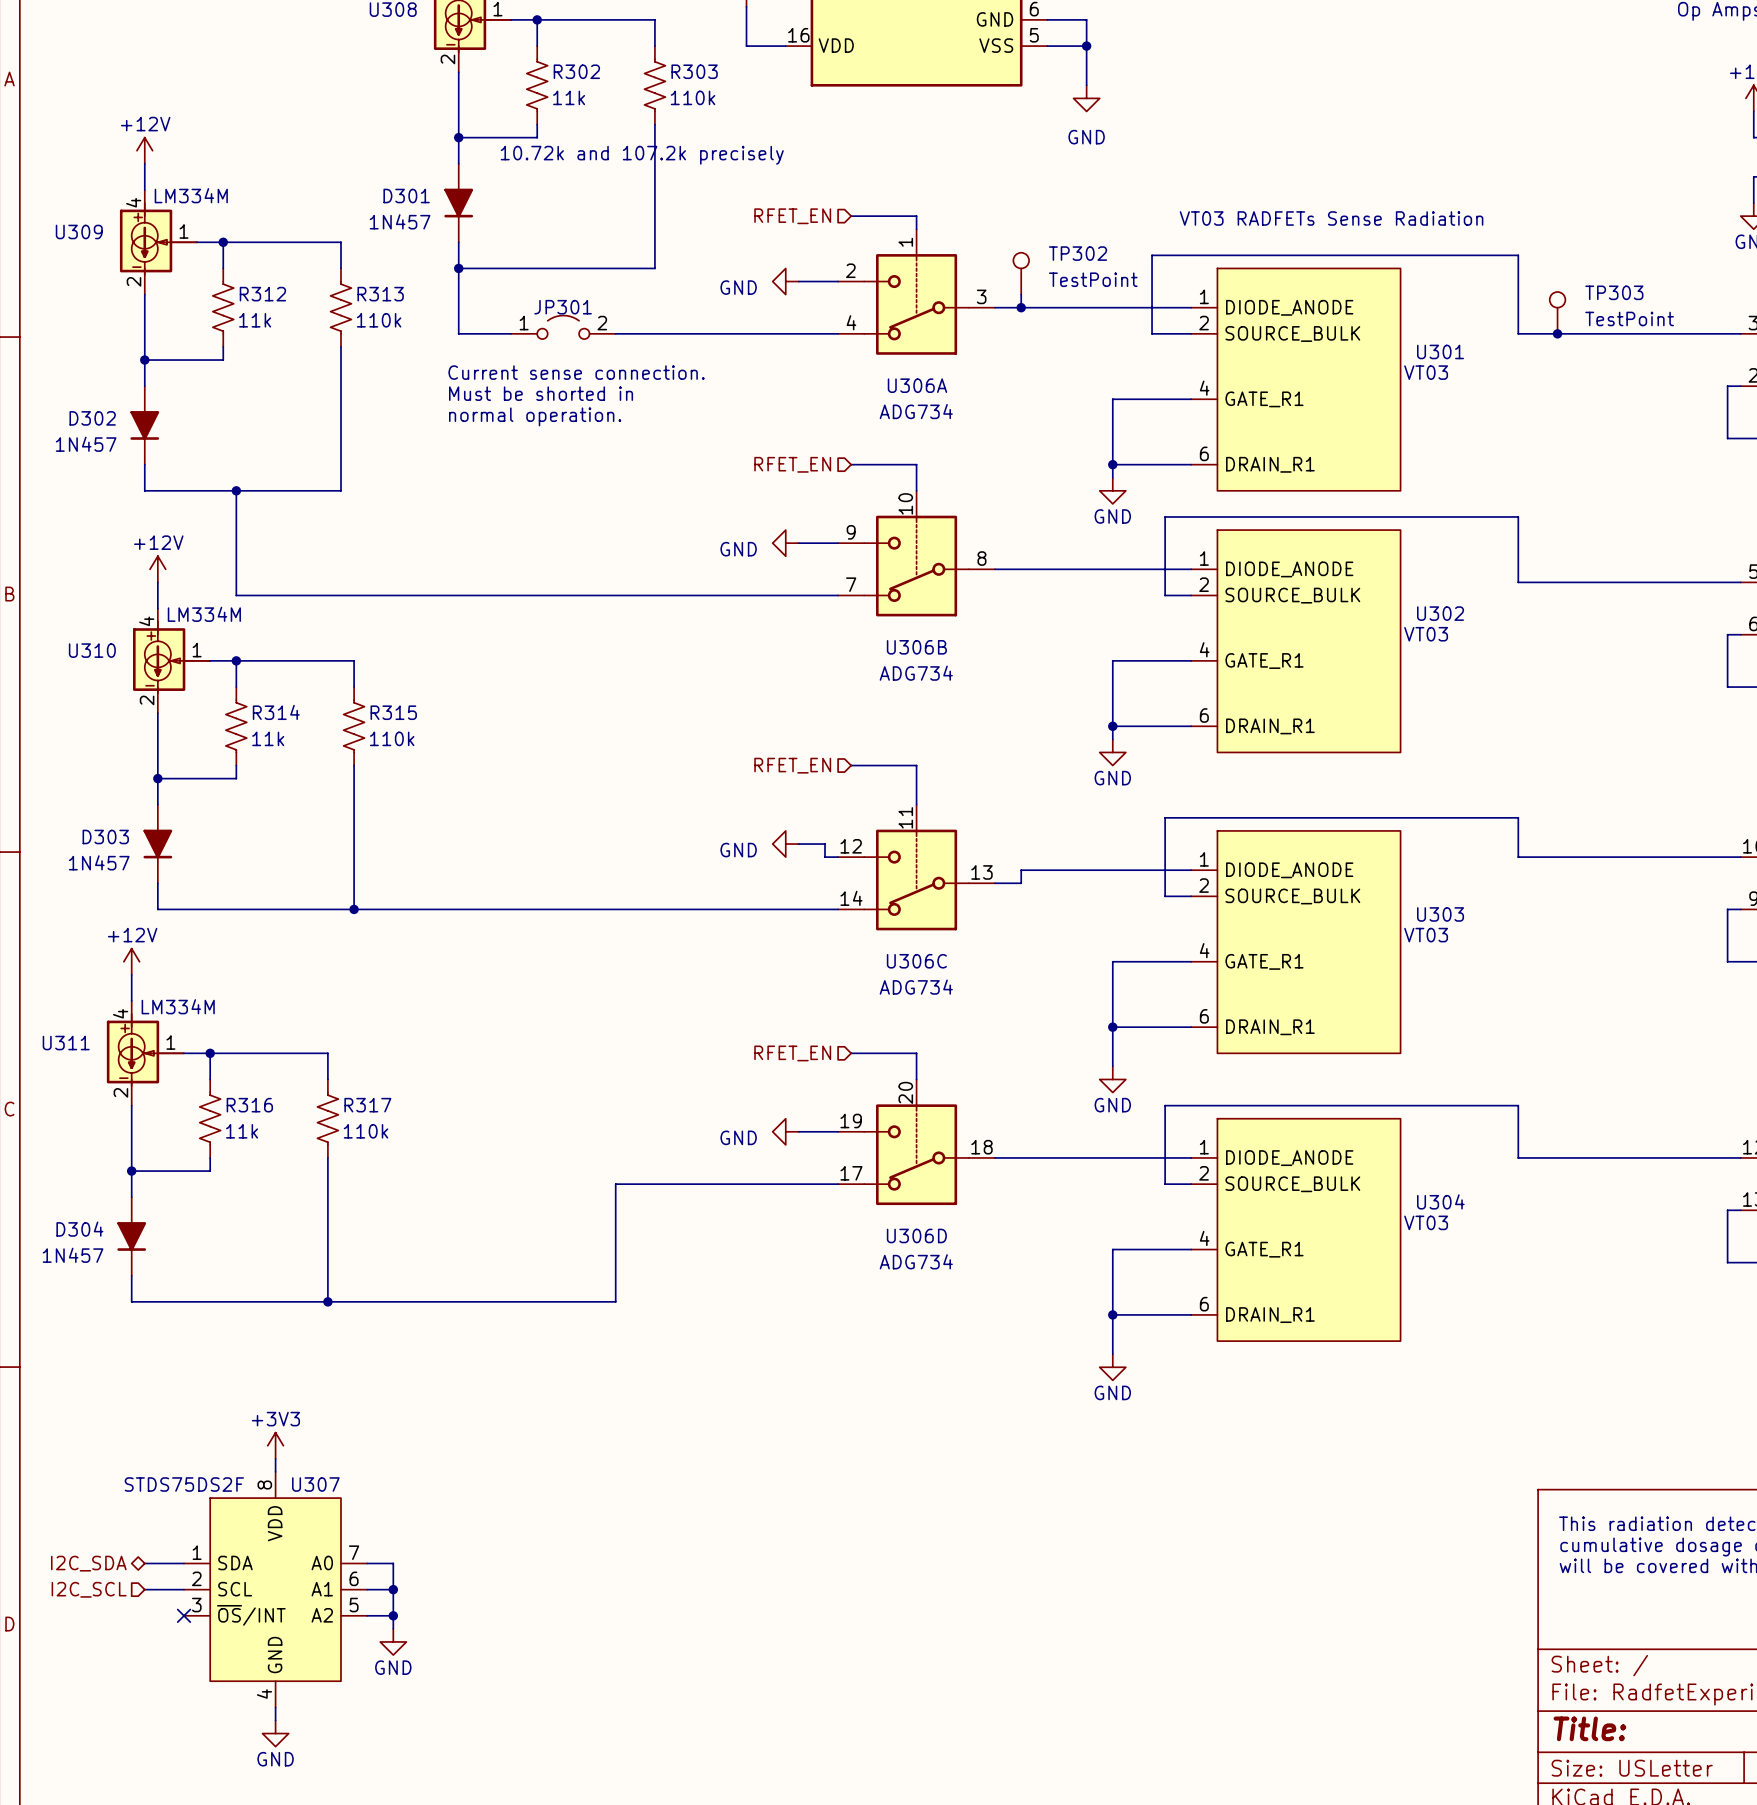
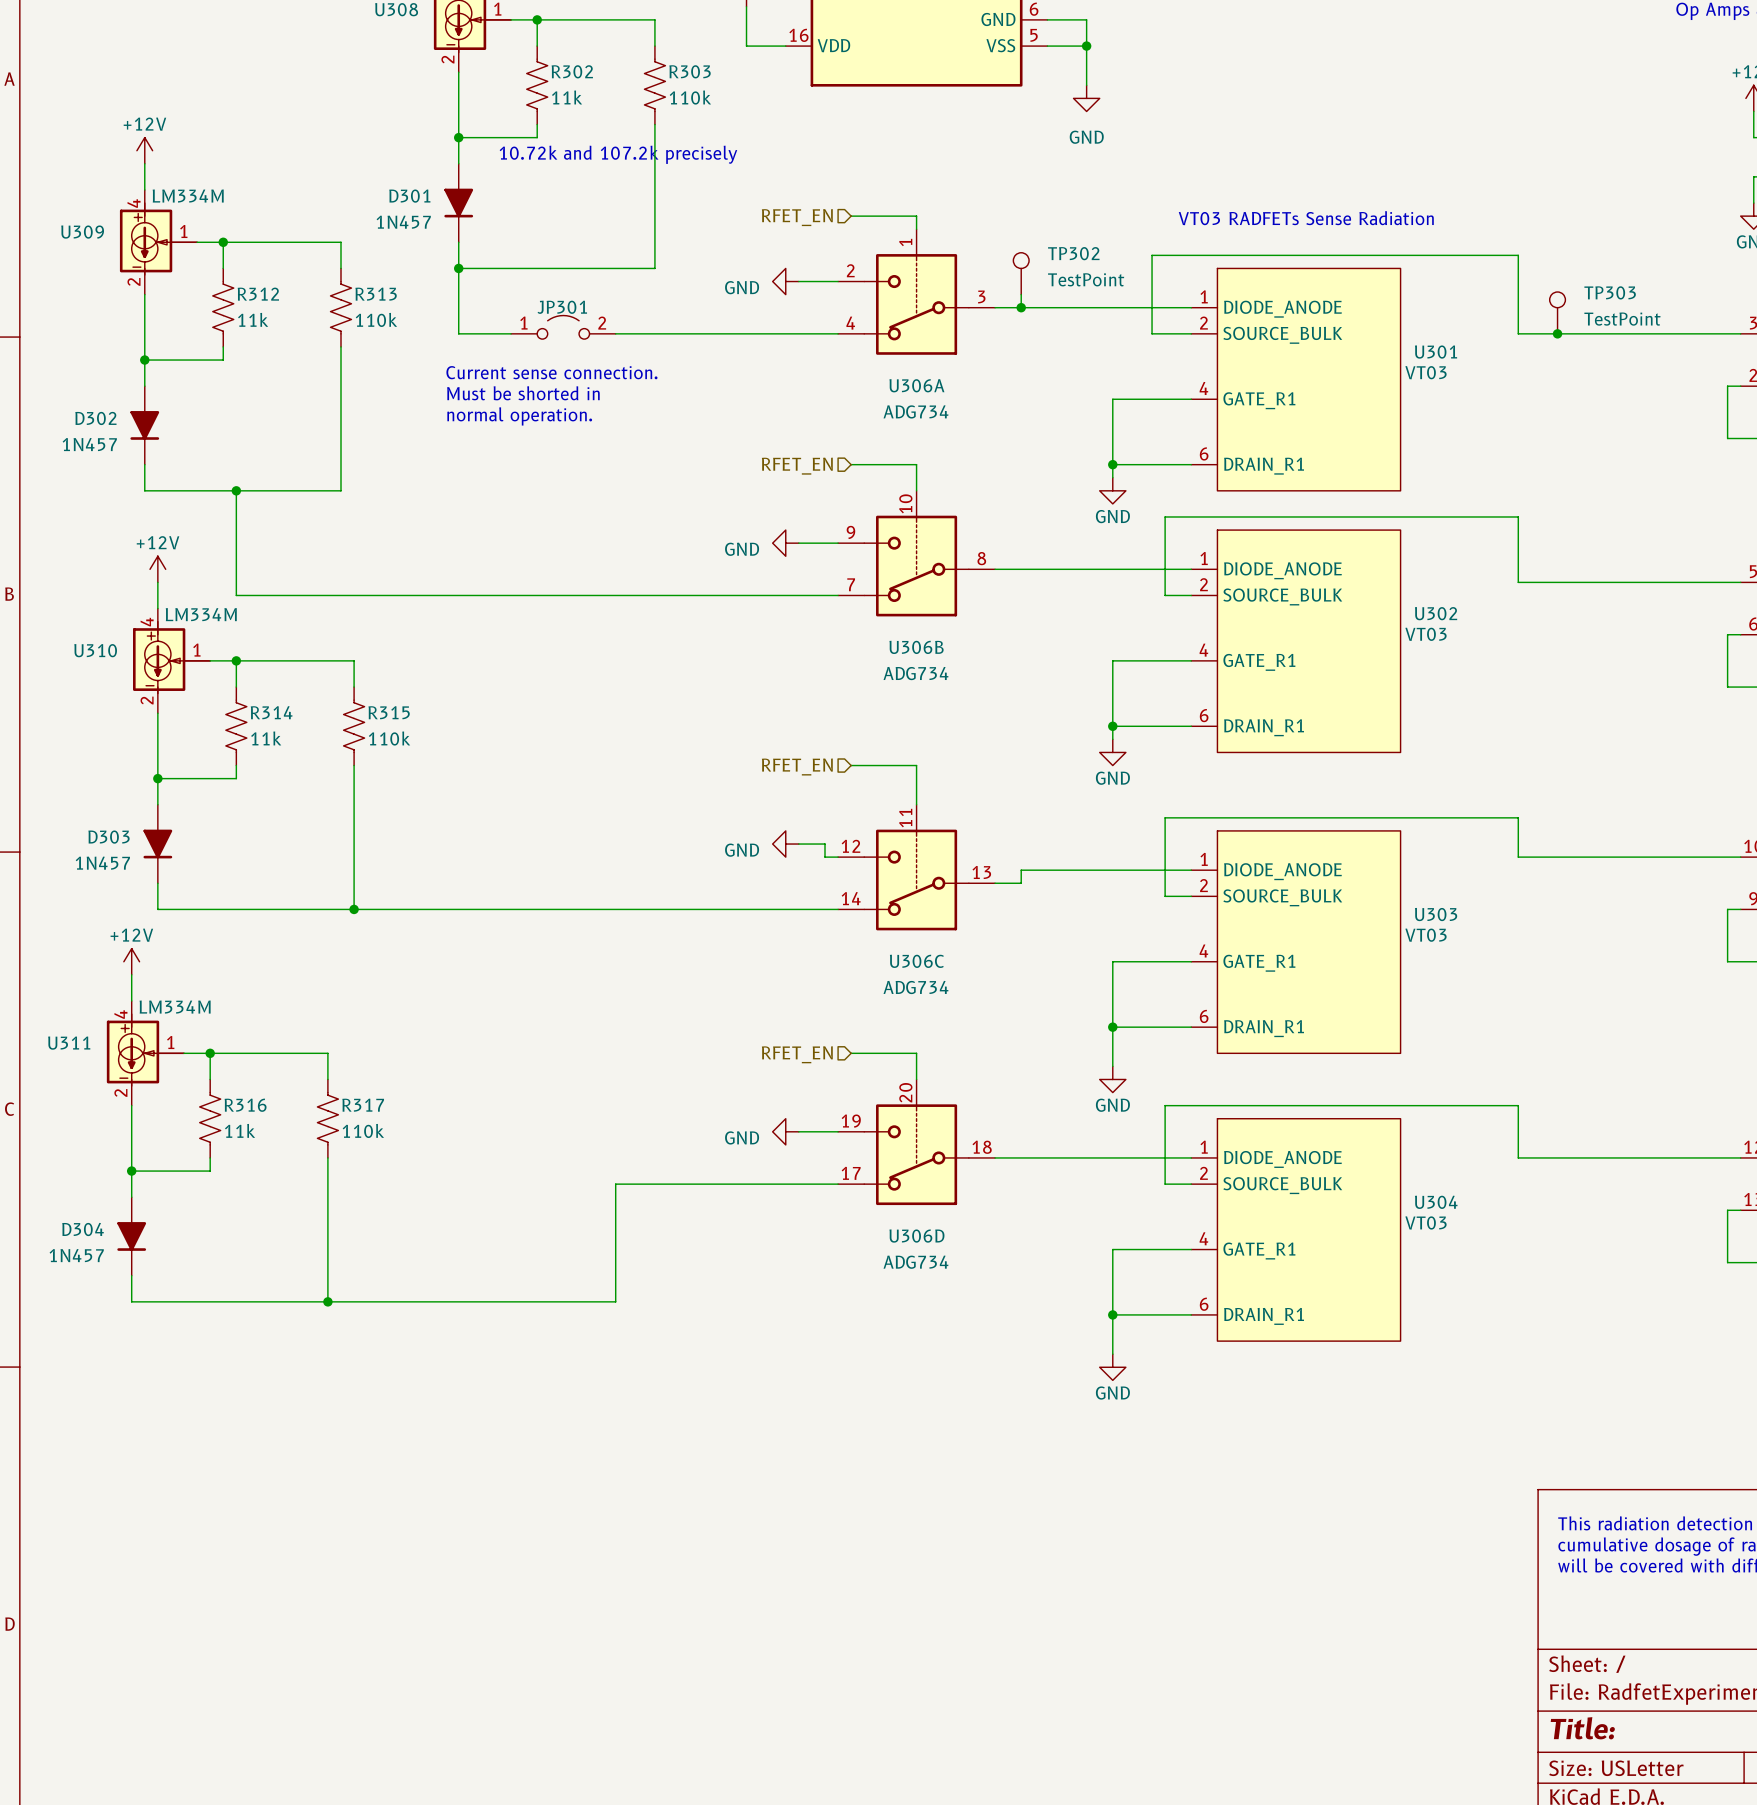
power symbol: +3V3 (275, 1445) -> none
wire: (275, 1458) (275, 1471) -> none
hierarchical label: I2C_SDA (88, 1563) -> none
wire: (144, 1563) (184, 1563) -> none
wire: (367, 1563) (393, 1563) (393, 1628) -> none
hierarchical label: I2C_SCL (89, 1589) -> none
wire: (144, 1589) (184, 1589) -> none
U307: STDS75DS2F (275, 1589) -> none
wire: (367, 1589) (393, 1589) -> none
junction: (393, 1589) -> none
no-connect mark: (184, 1615) -> none
wire: (367, 1615) (393, 1615) -> none
junction: (393, 1615) -> none
power symbol: GND (393, 1641) -> none
wire: (275, 1707) (275, 1720) -> none
power symbol: GND (275, 1733) -> none

